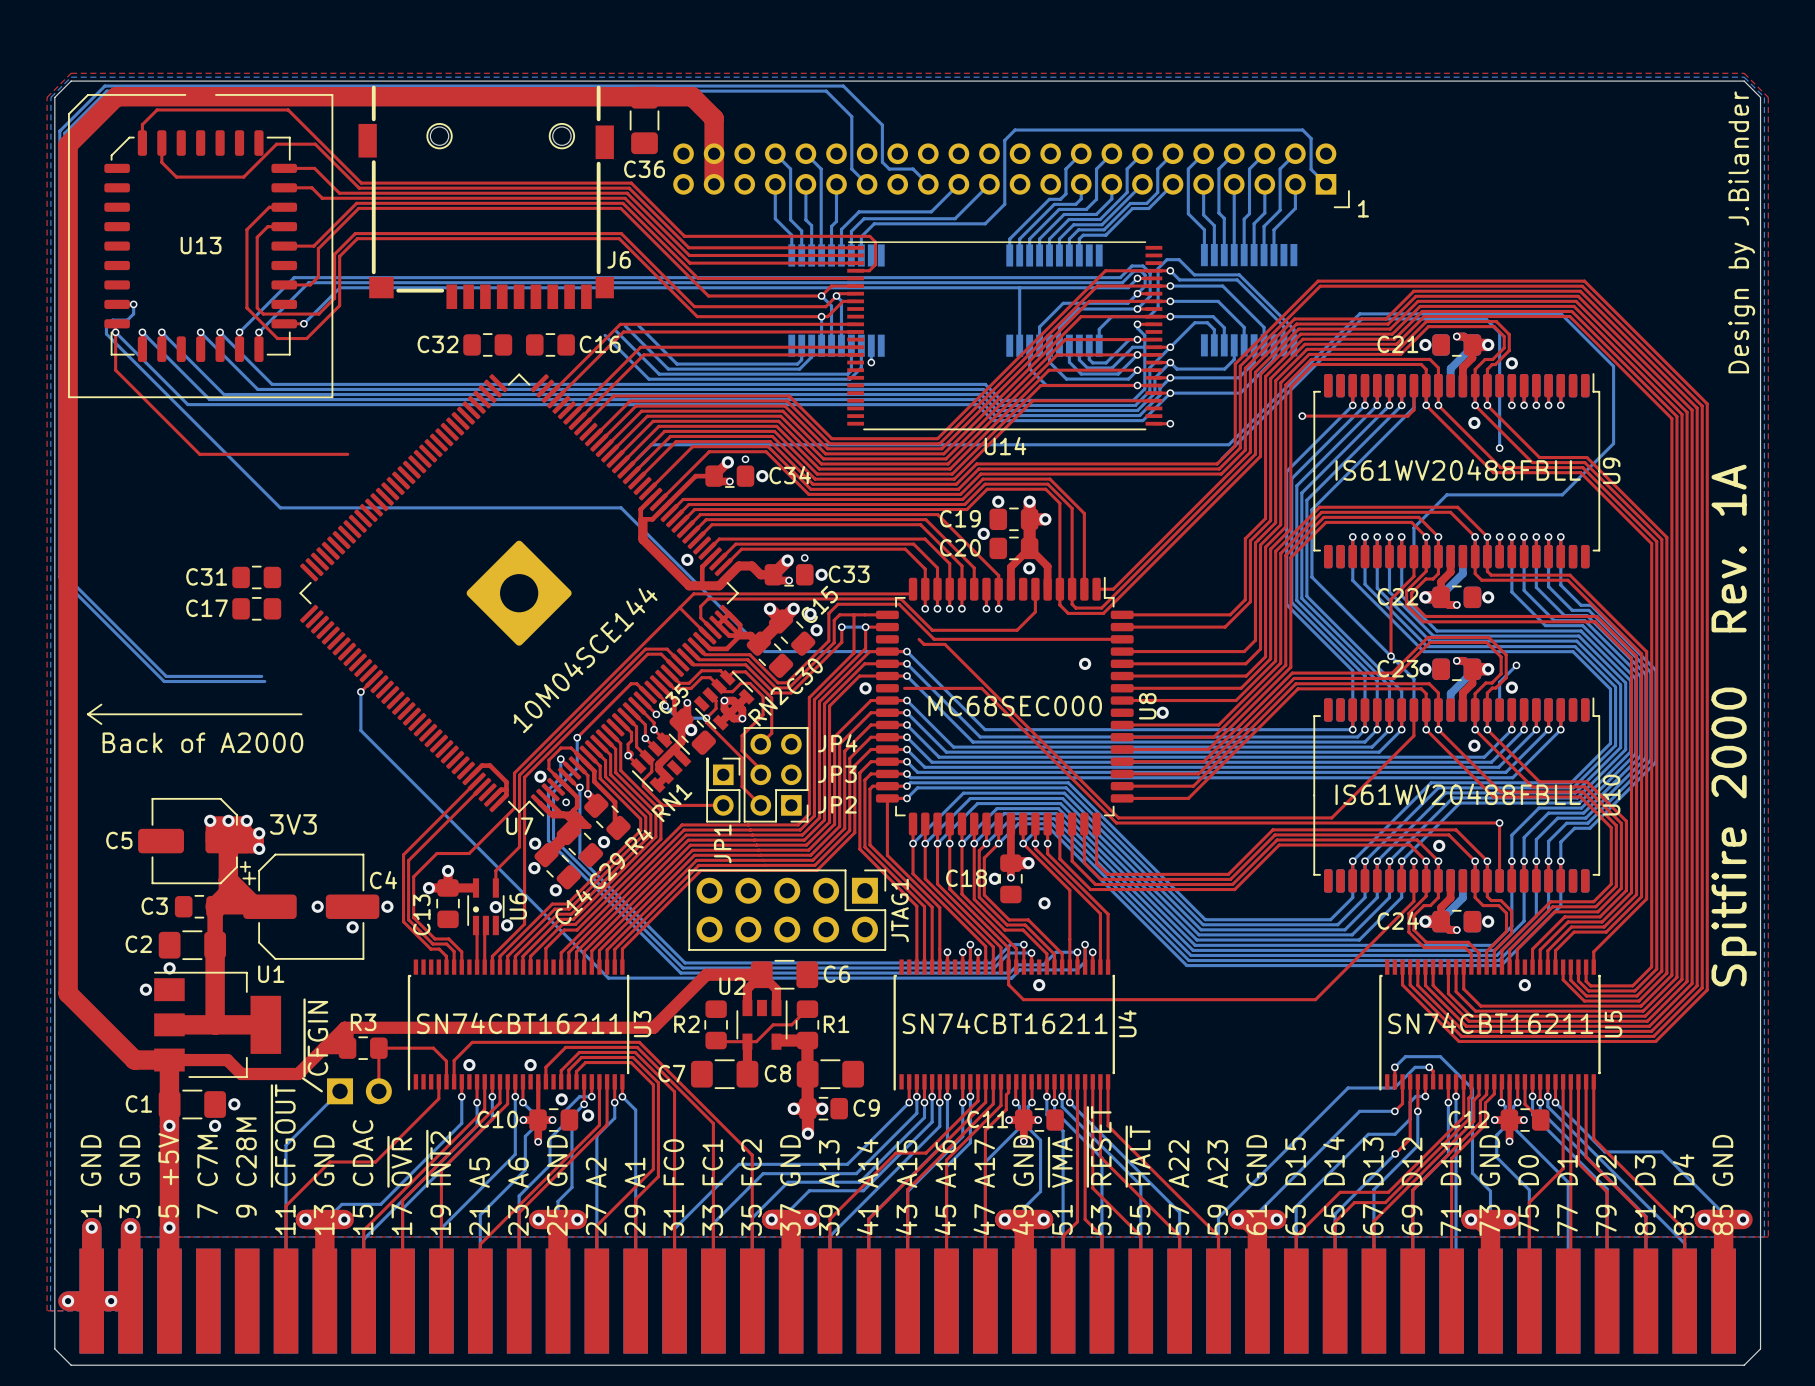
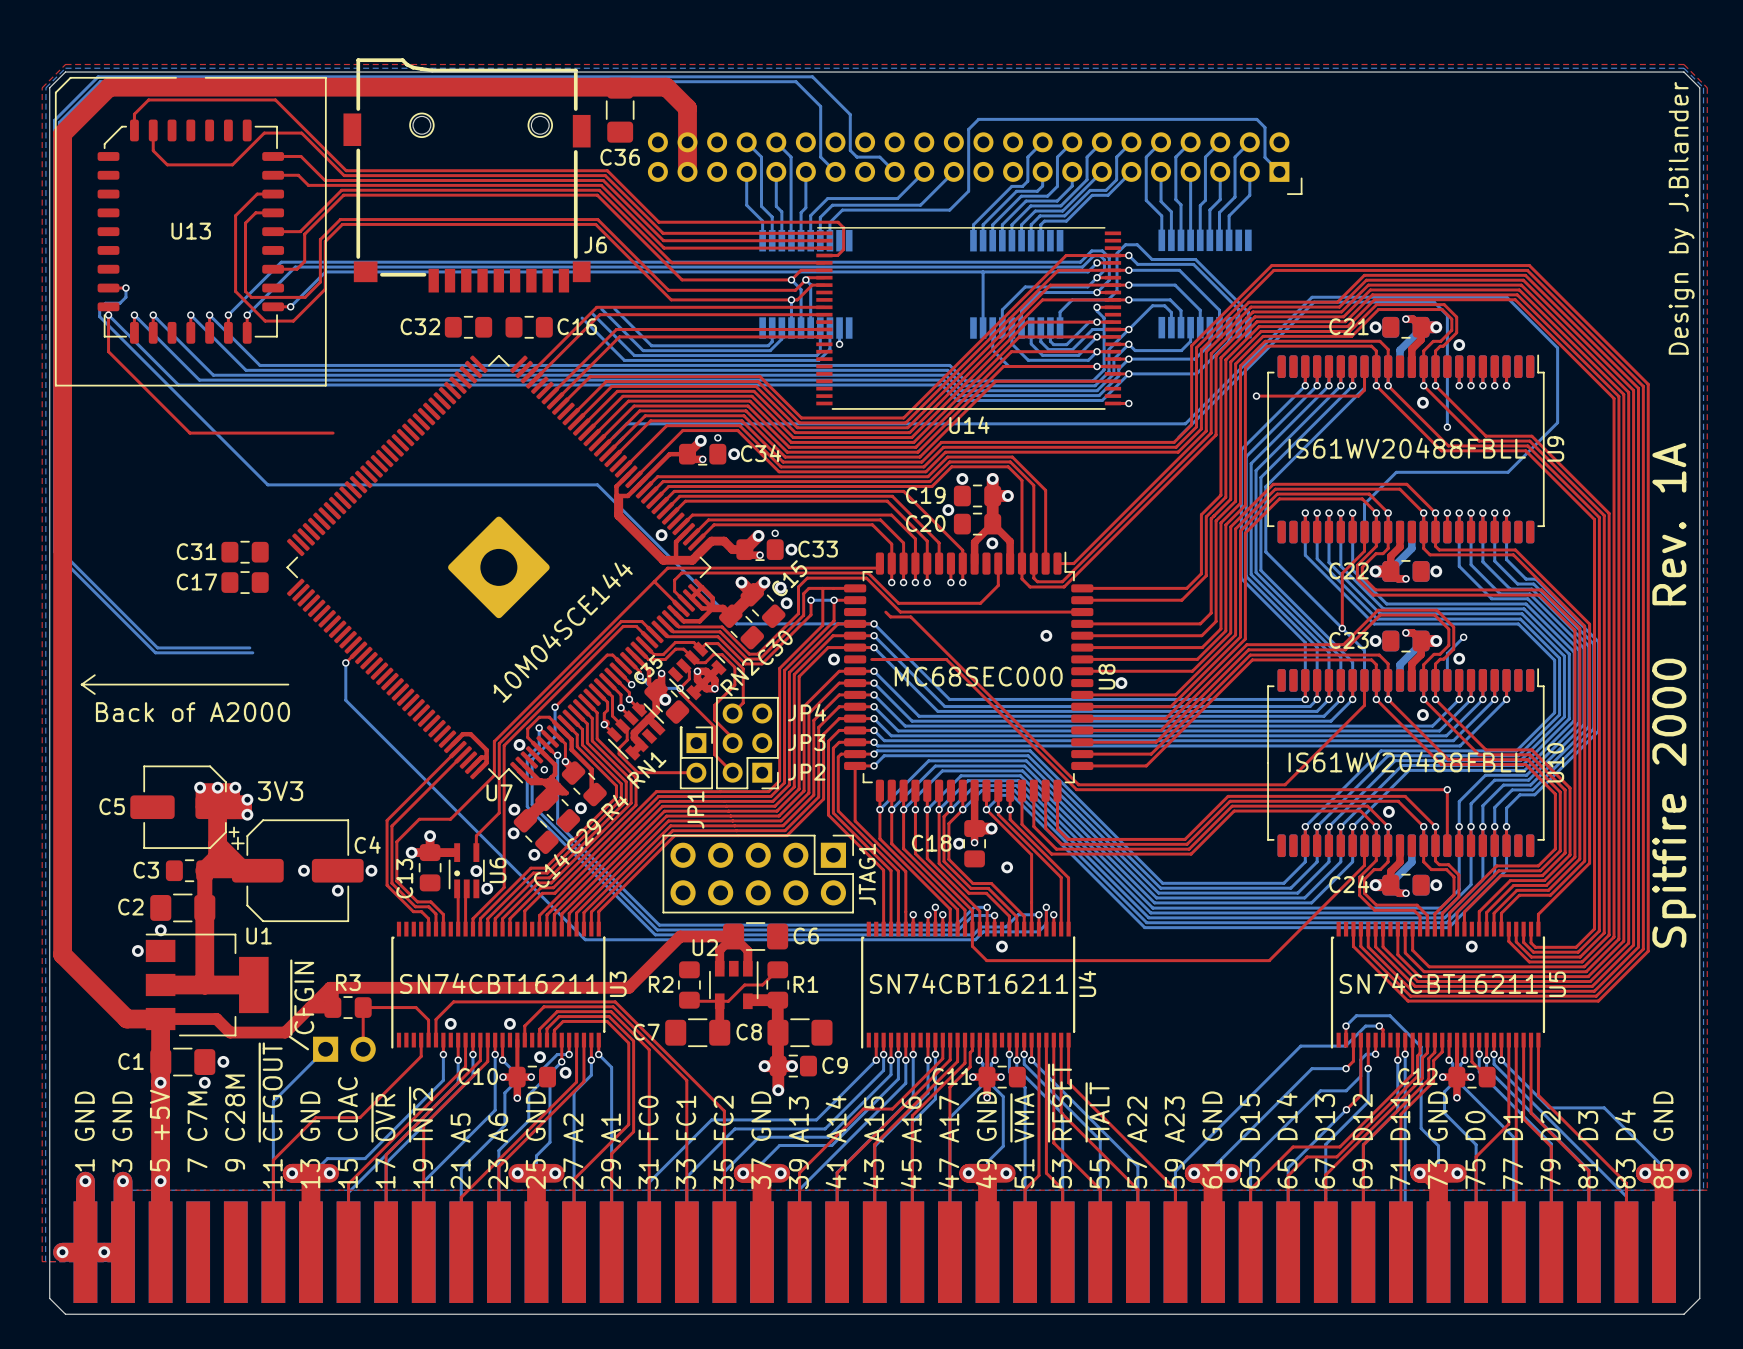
J6 footprint: [358, 85, 614, 310] -> [343, 58, 591, 293]
U13 footprint: [68, 94, 334, 399] -> [54, 76, 327, 387]
text: 1 (1363, 208) -> none

